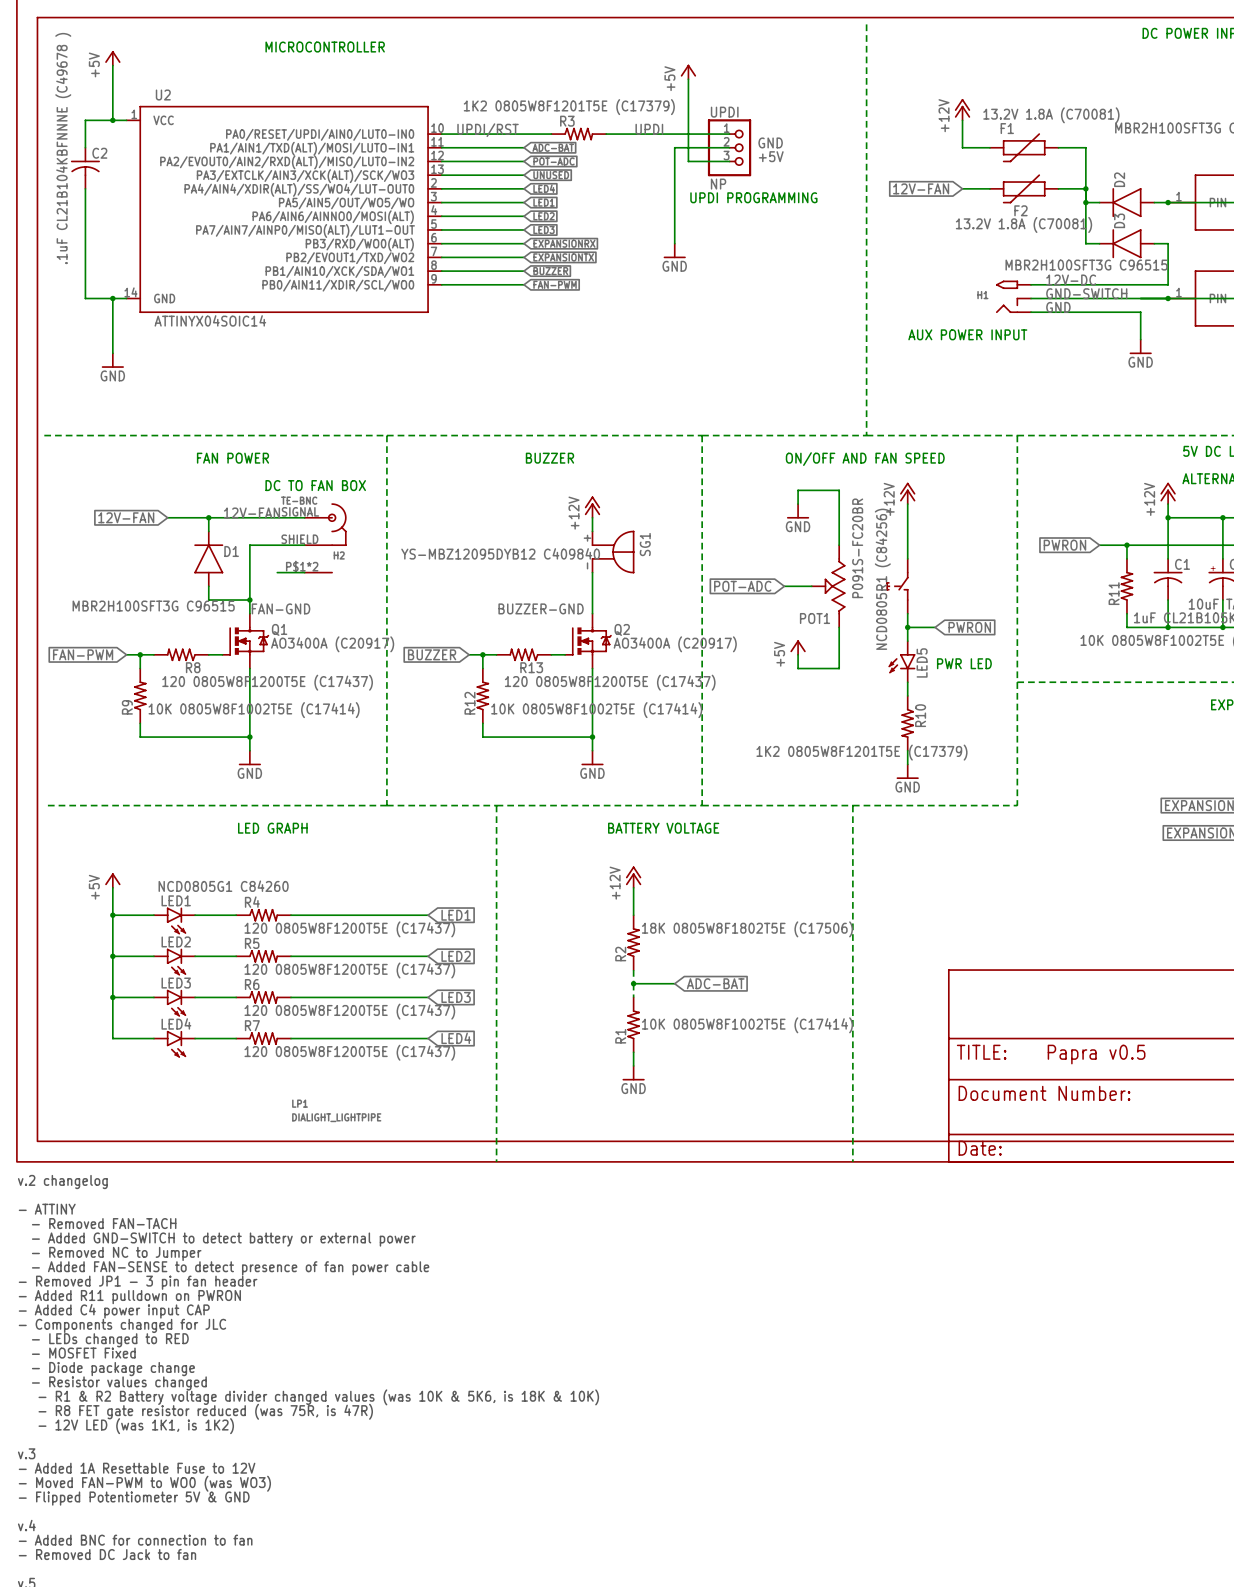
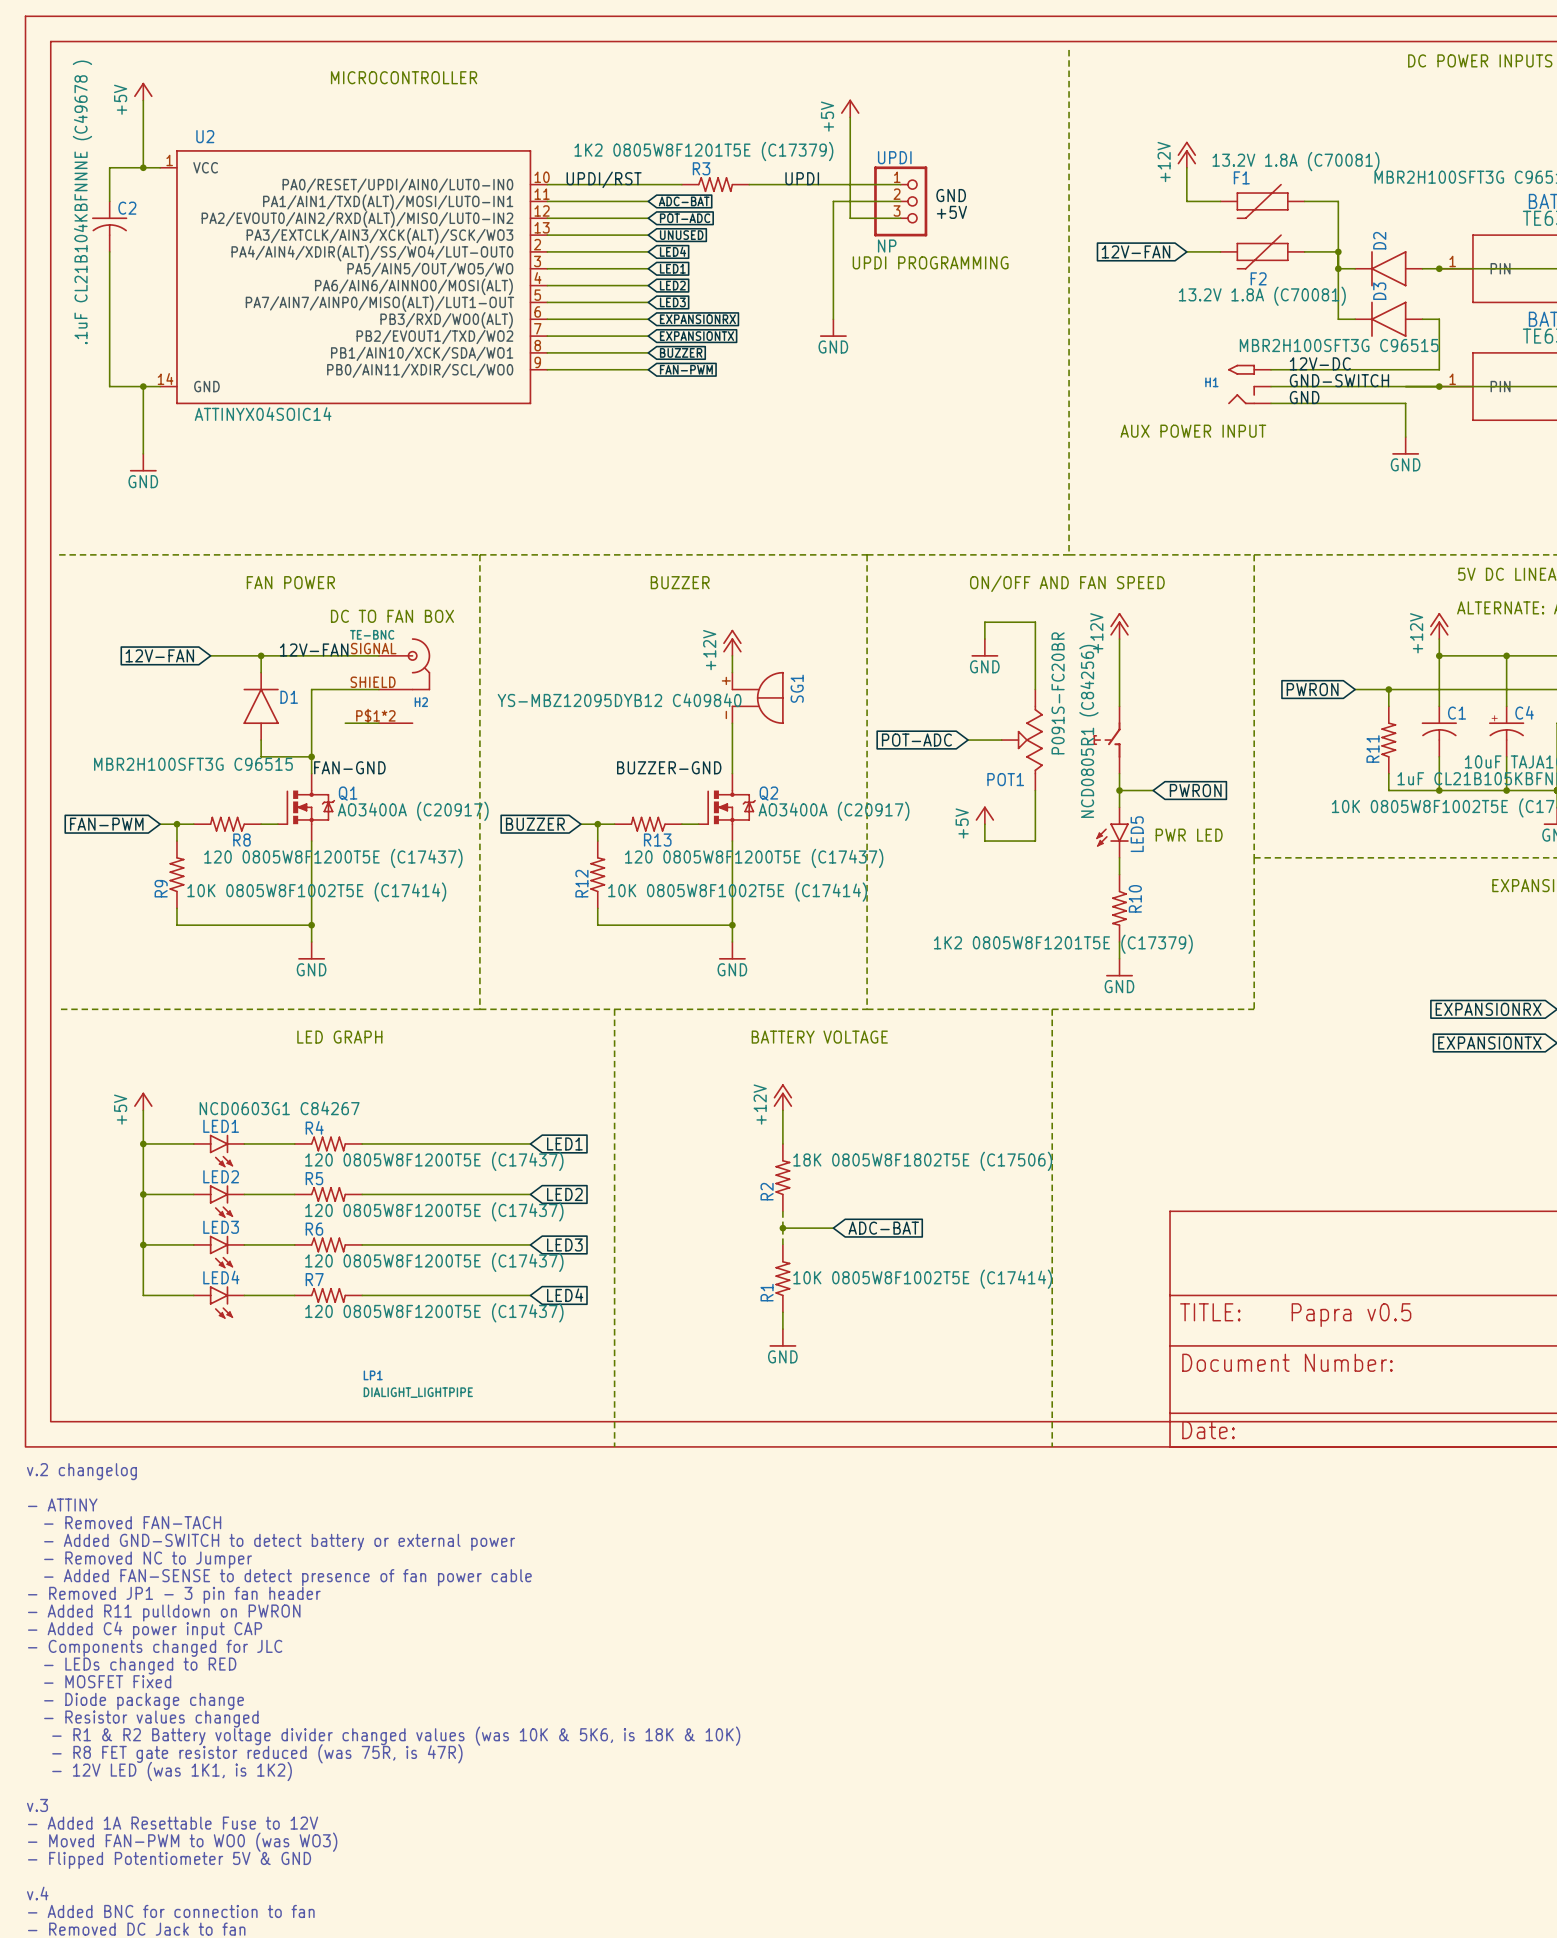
LED1 value: NCD0805G1 C84260 (223, 886) -> NCD0603G1 C84267 (279, 1108)

